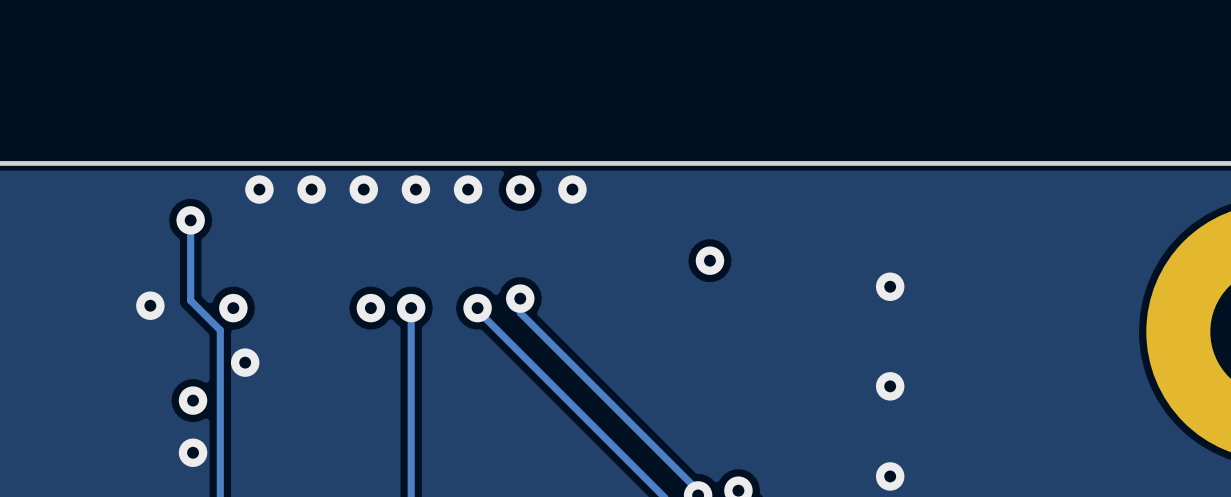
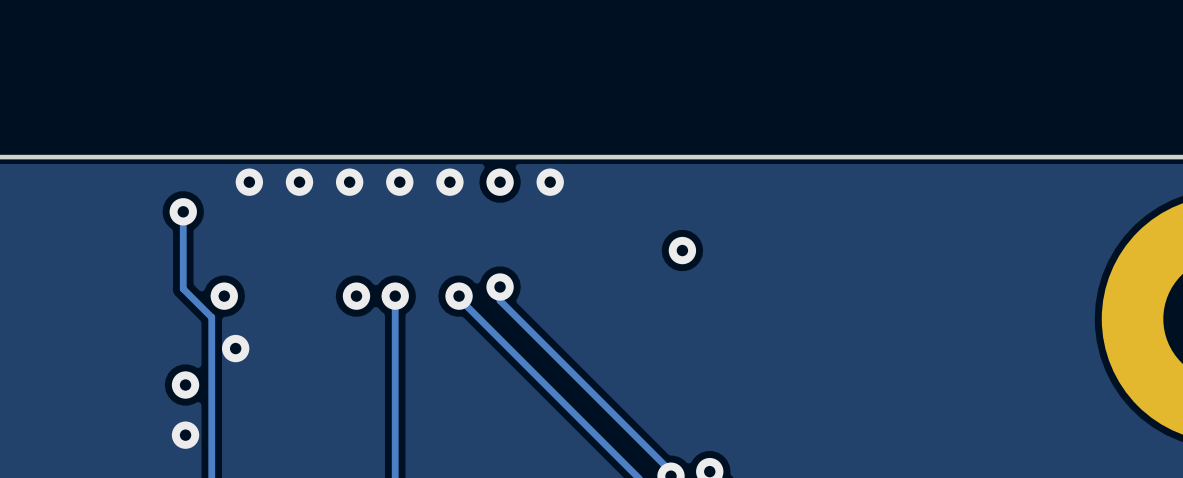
via: (890, 286) -> none
via: (150, 305) -> none
via: (890, 386) -> none
via: (890, 476) -> none

